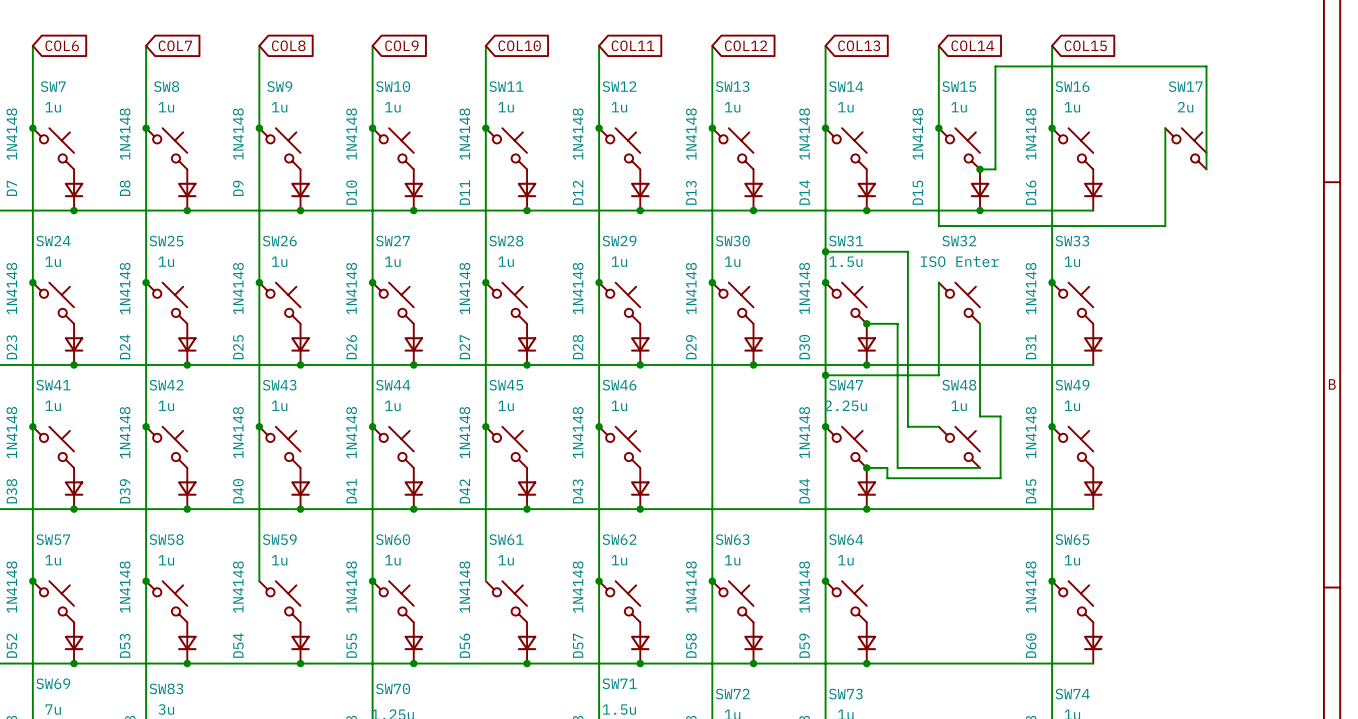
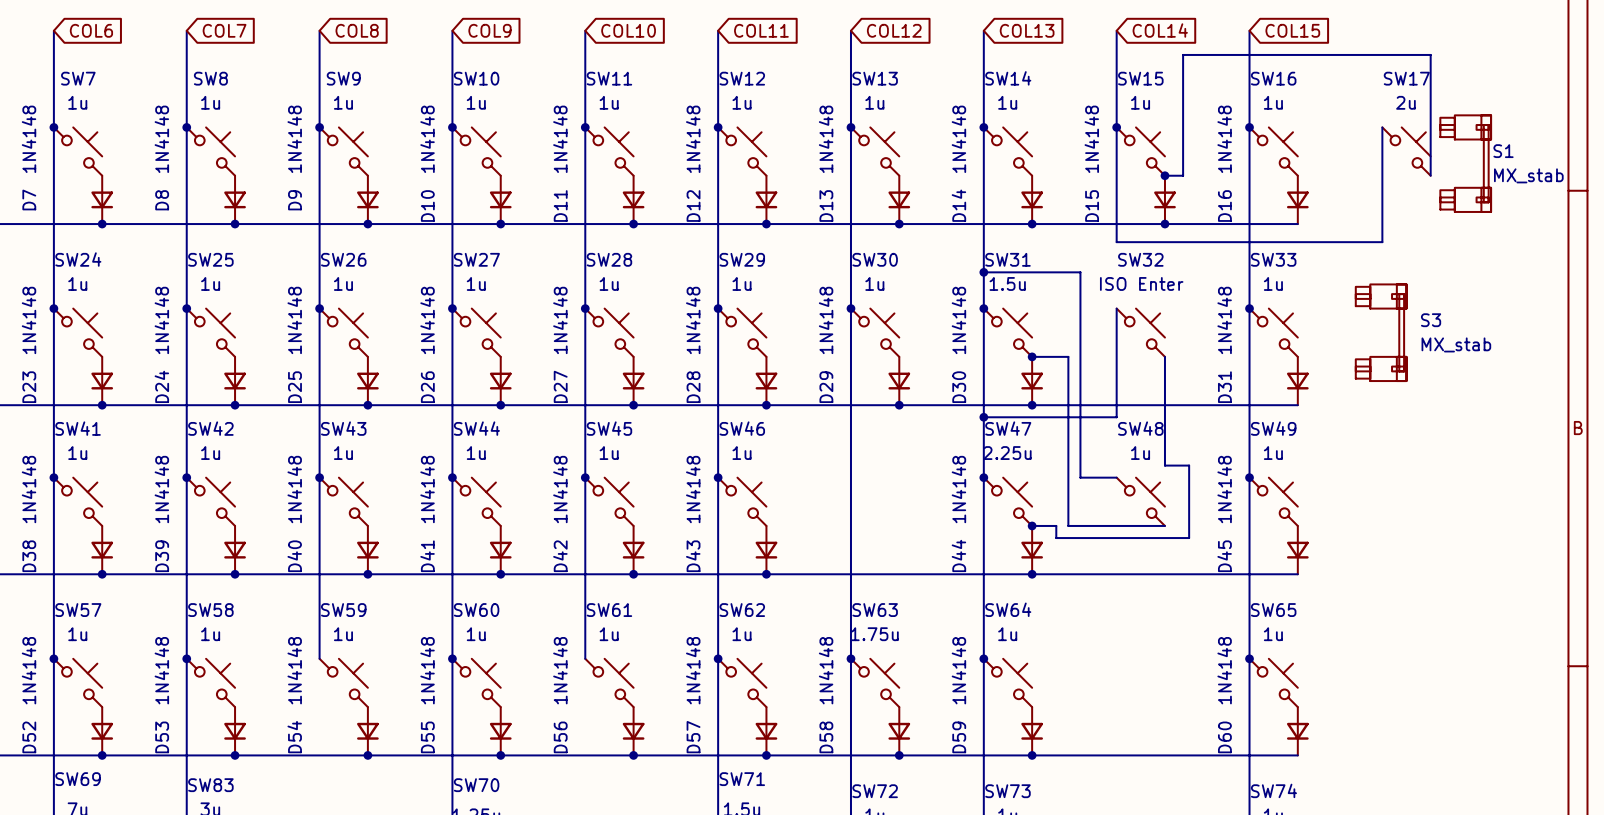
S1: none -> MX_stab (1465, 163)
S3: none -> MX_stab (1381, 332)
SW63 value: 1u (732, 560) -> 1.75u (874, 634)

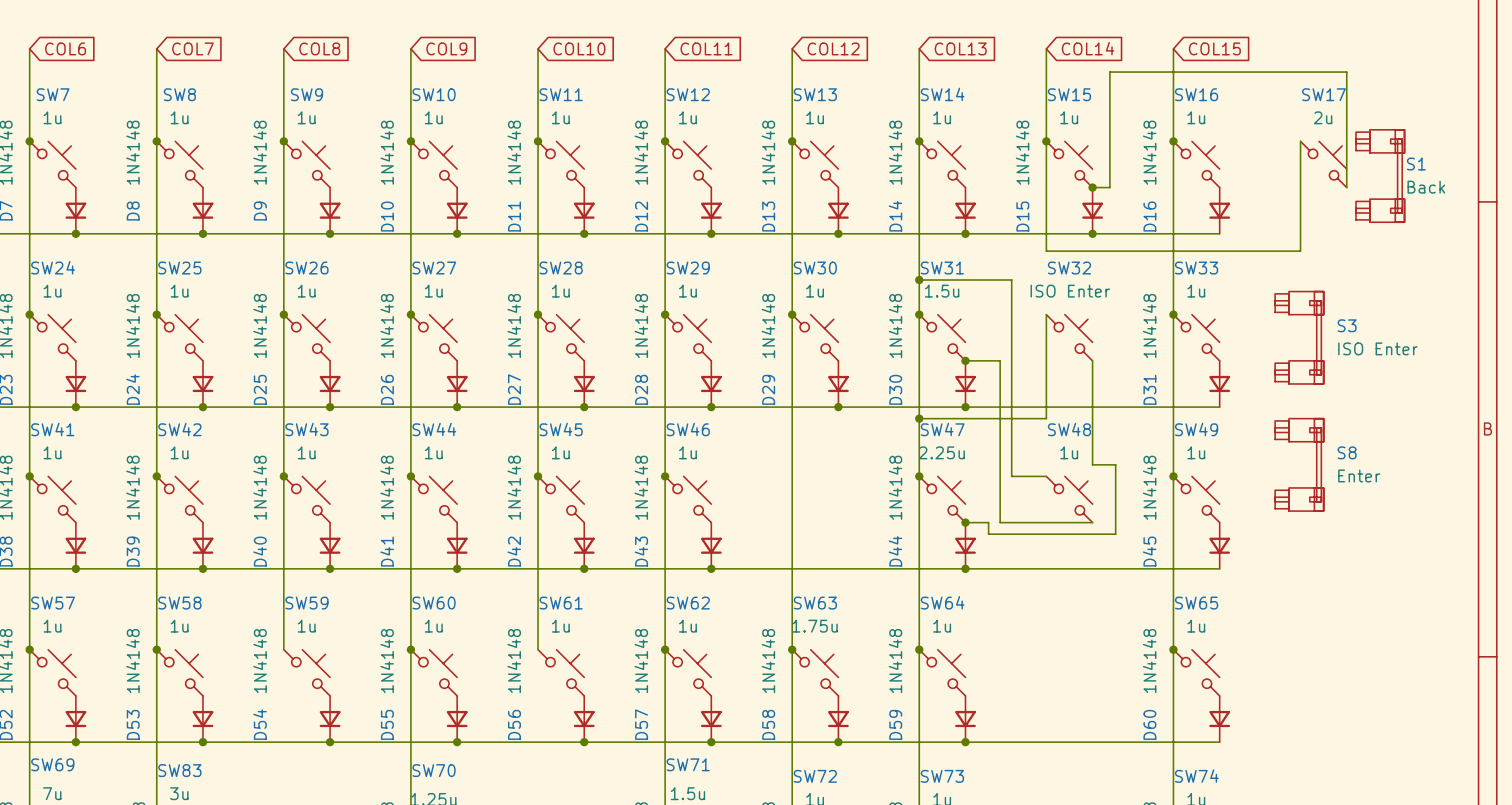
S1 value: MX_stab (1528, 175) -> Back (1426, 187)
S3 value: MX_stab (1456, 344) -> ISO Enter (1377, 348)
S8: none -> Enter (1299, 464)

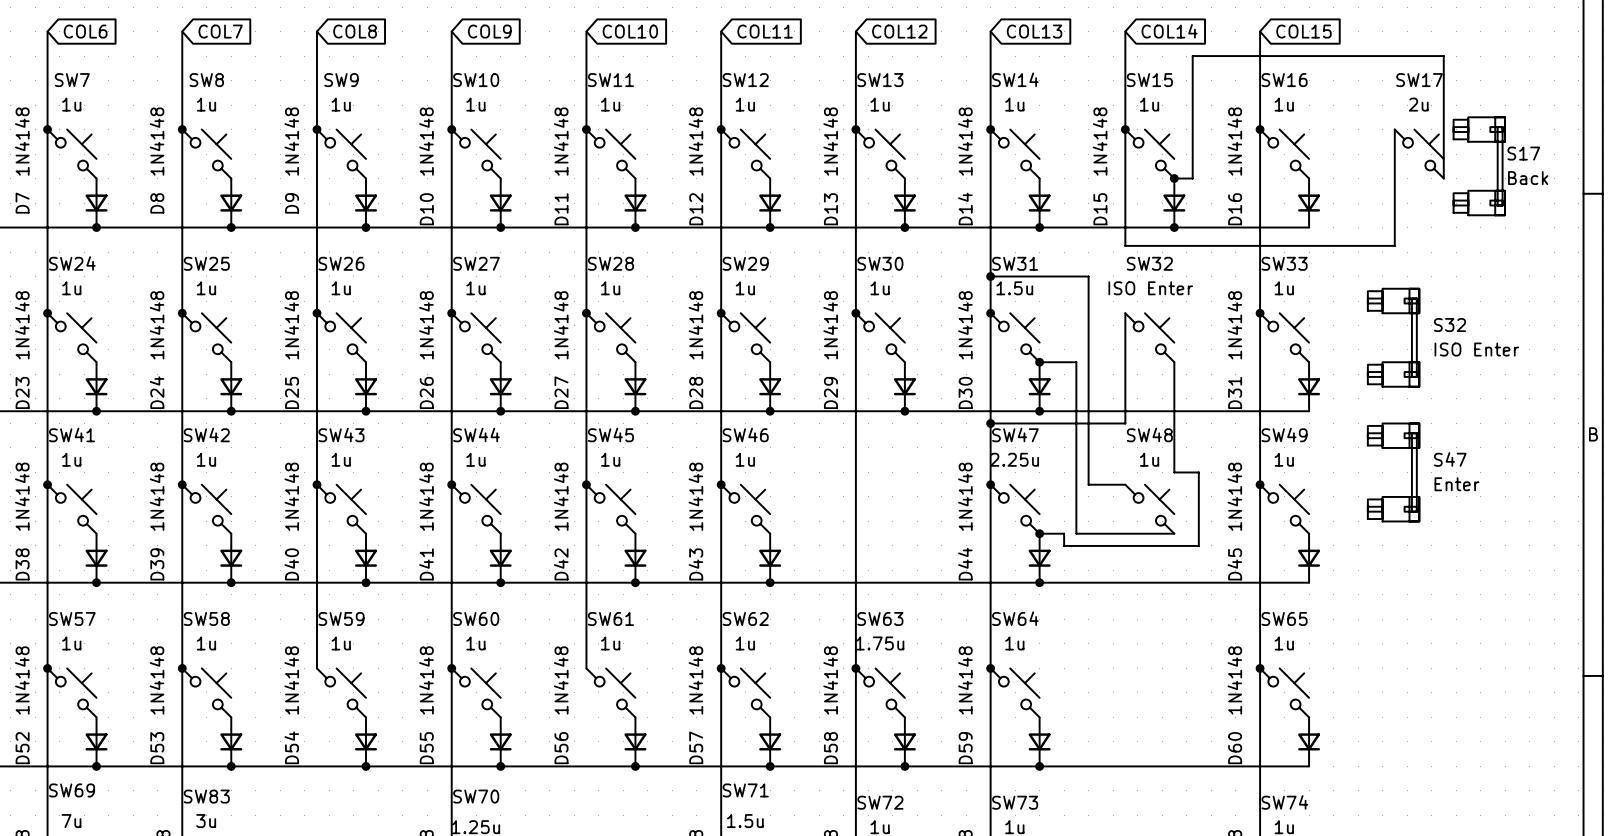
S1 name: S1 (1416, 164) -> S17 (1523, 153)
S3 name: S3 (1347, 325) -> S32 (1450, 325)
S8 name: S8 (1347, 452) -> S47 (1450, 459)

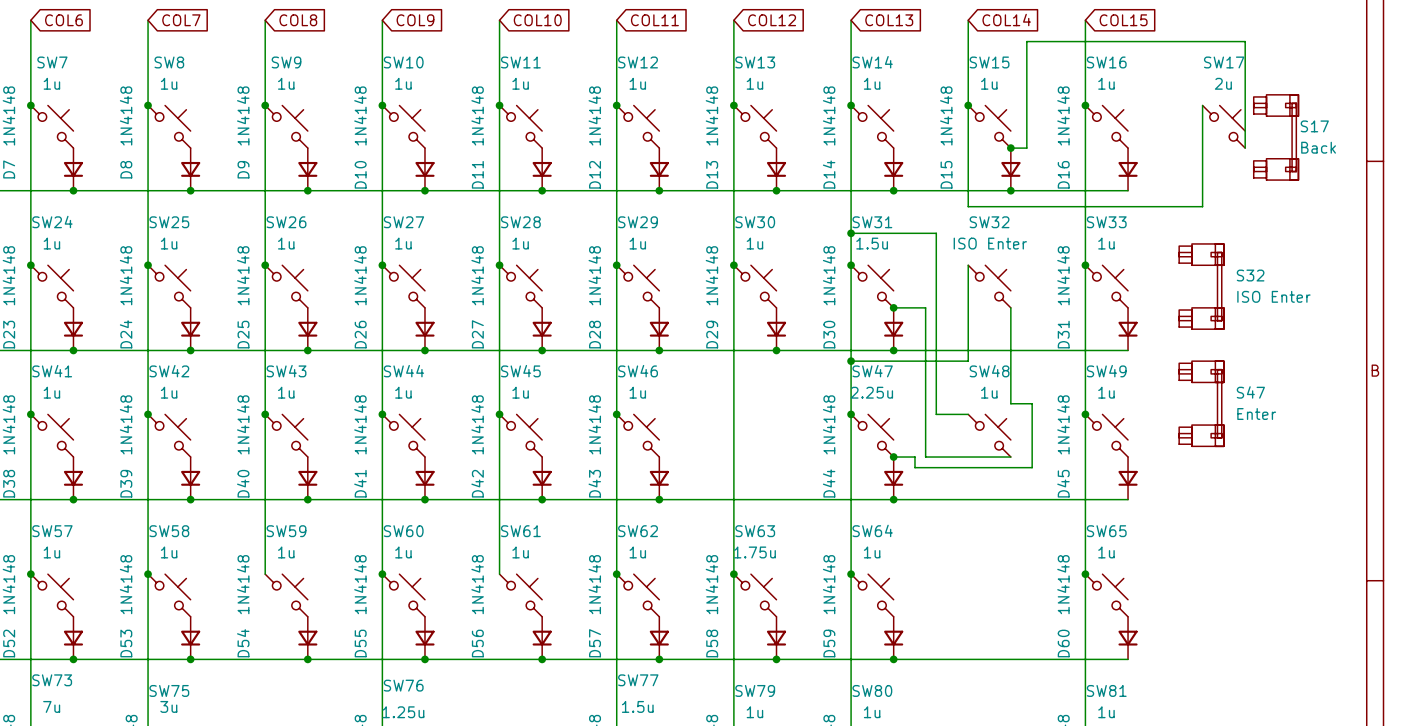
SW69 name: SW69 (72, 790) -> SW73 (52, 680)
SW71 name: SW71 (745, 790) -> SW77 (638, 680)
SW83 name: SW83 (206, 796) -> SW75 (169, 690)
SW70 name: SW70 (476, 796) -> SW76 (403, 685)
SW72 name: SW72 (880, 802) -> SW79 (755, 690)
SW73 name: SW73 (1015, 802) -> SW80 (872, 690)
SW74 name: SW74 (1284, 802) -> SW81 (1106, 690)

